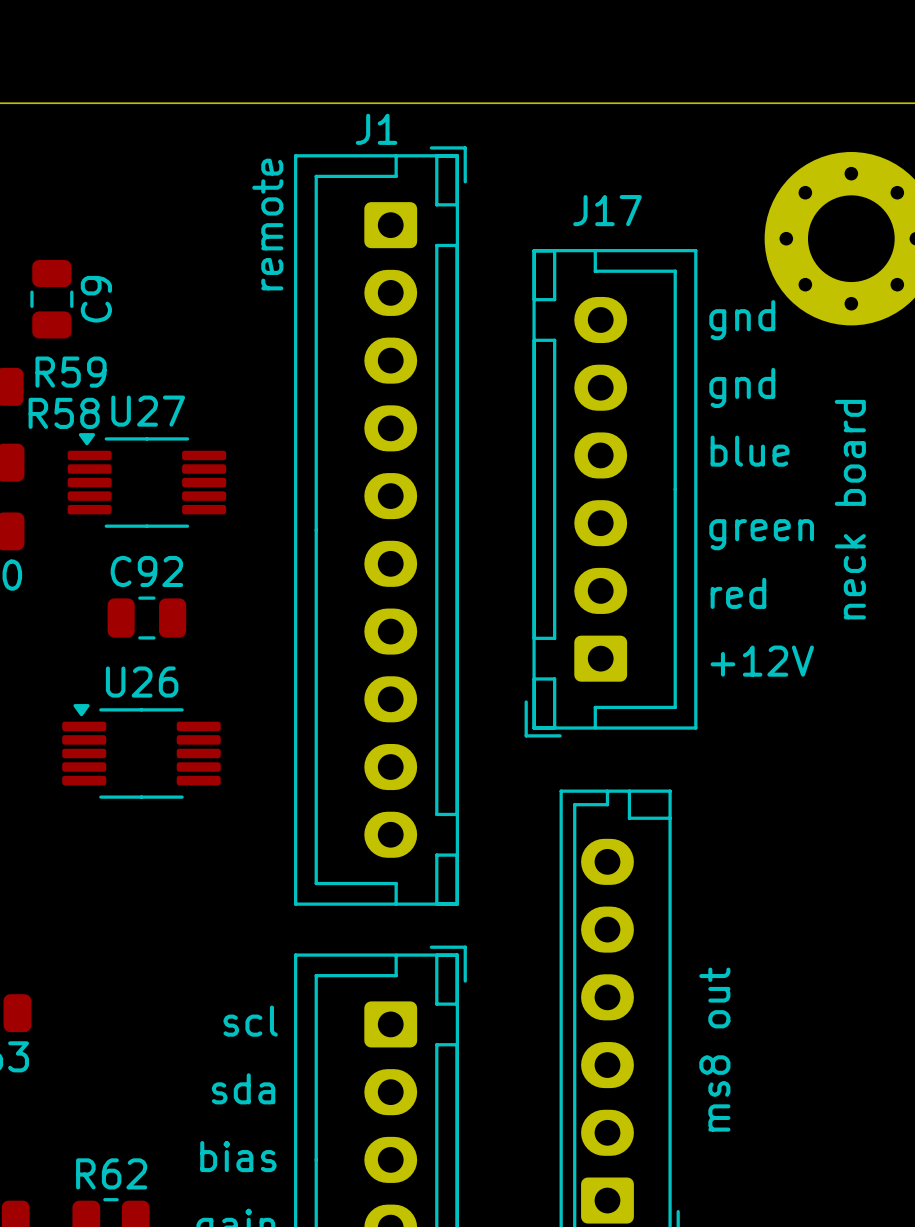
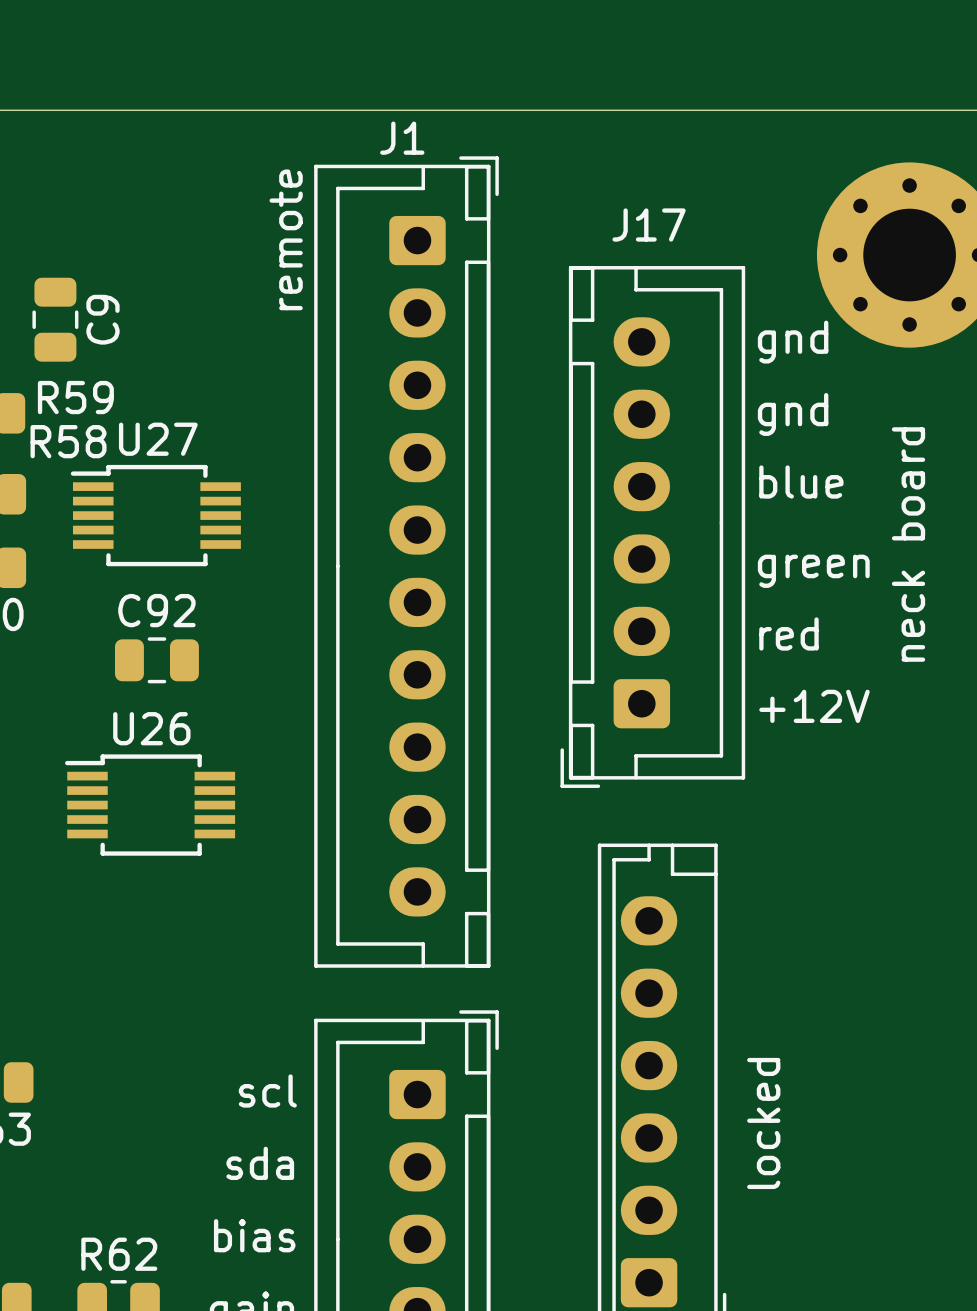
U27 footprint: [67, 433, 227, 528] -> [70, 464, 241, 567]
U26 footprint: [62, 704, 221, 799] -> [65, 754, 236, 856]
text: ms8 out (714, 1049) -> locked (763, 1123)

